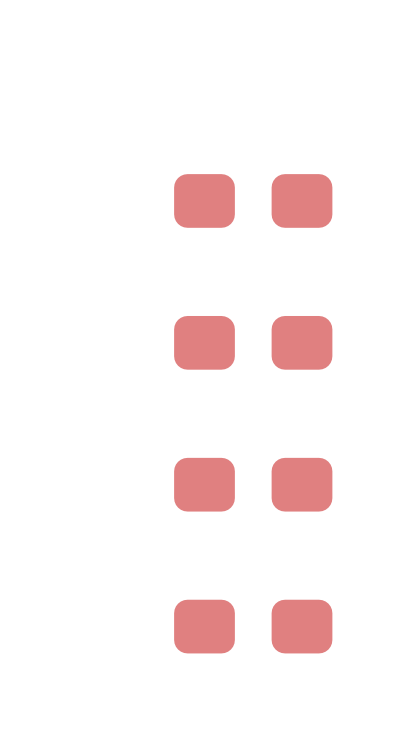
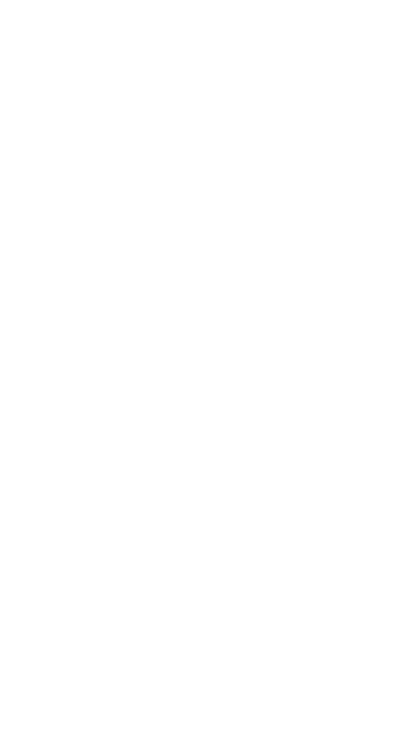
part: (253, 200) -> none
part: (253, 342) -> none
part: (253, 484) -> none
part: (253, 626) -> none

